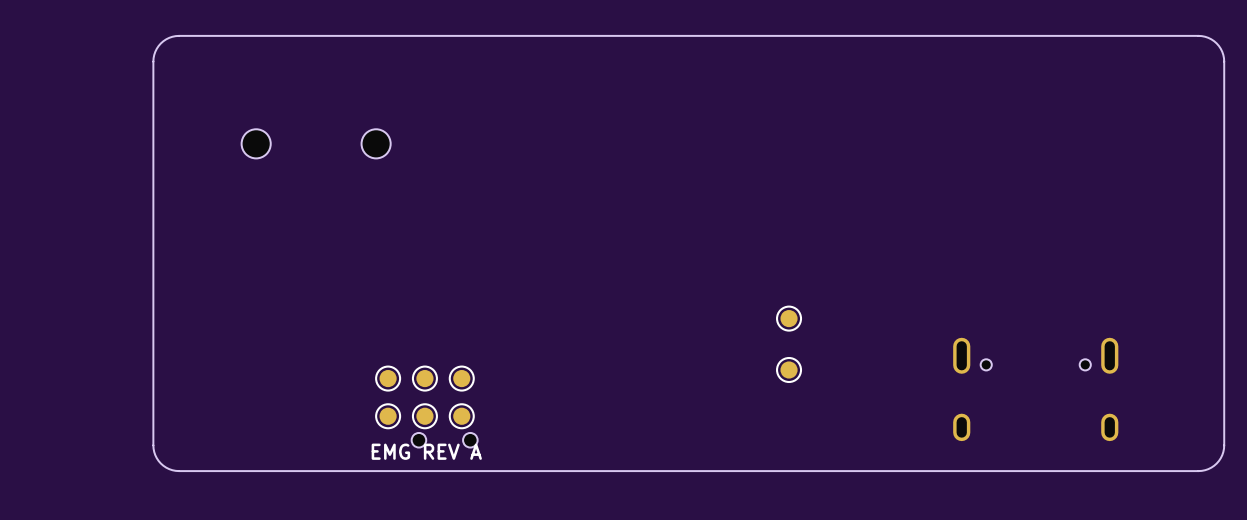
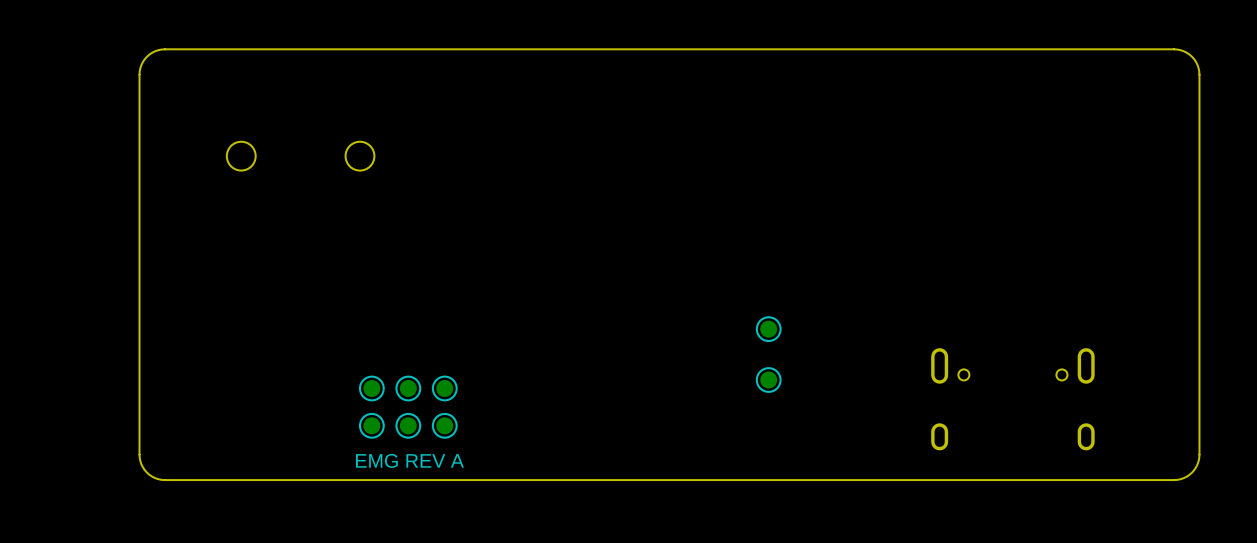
part: (444, 440) -> none

